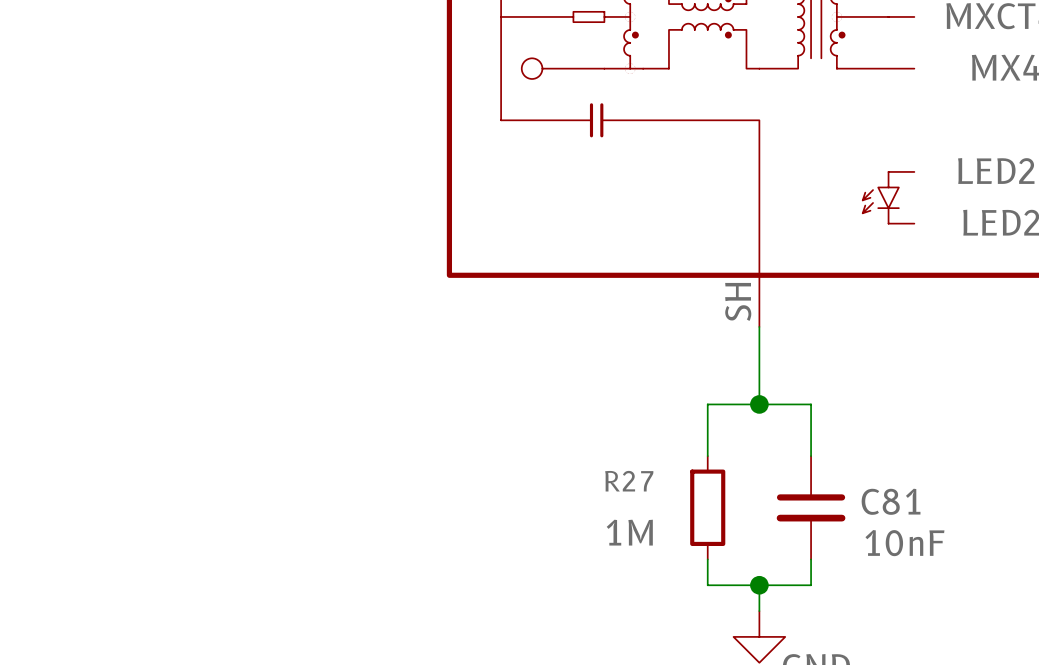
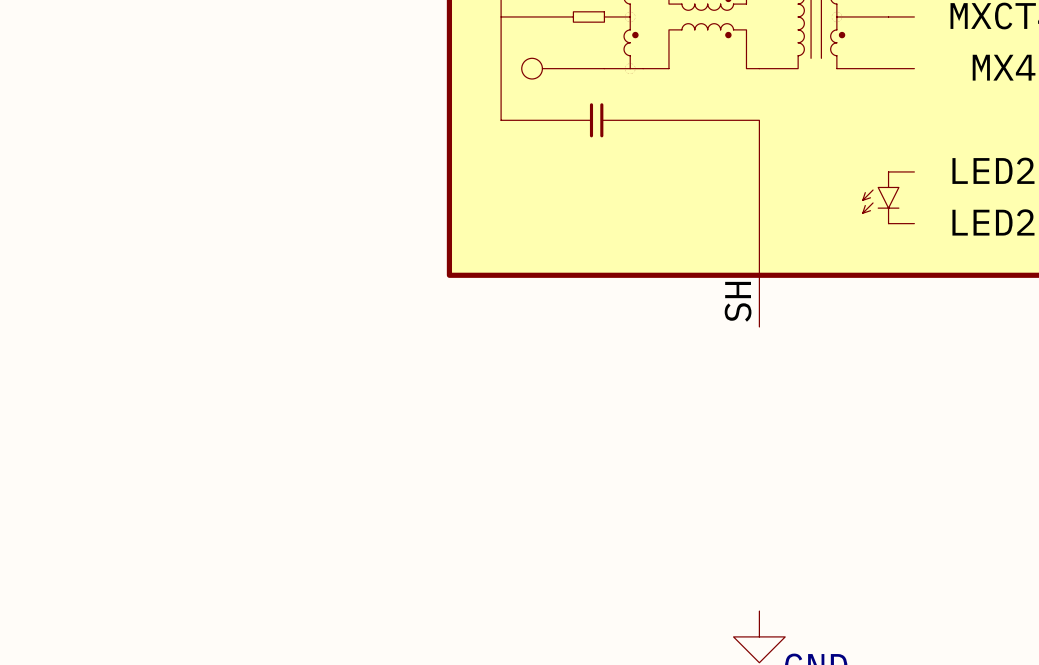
wire: (759, 326) (759, 404) -> none
junction: (759, 404) -> none
wire: (707, 456) (707, 404) (811, 404) (811, 456) -> none
R27: 1M (707, 507) -> none
C81: 10nF (811, 507) -> none
wire: (707, 559) (707, 585) (811, 585) (811, 559) -> none
wire: (759, 585) (759, 611) -> none
junction: (759, 585) -> none

